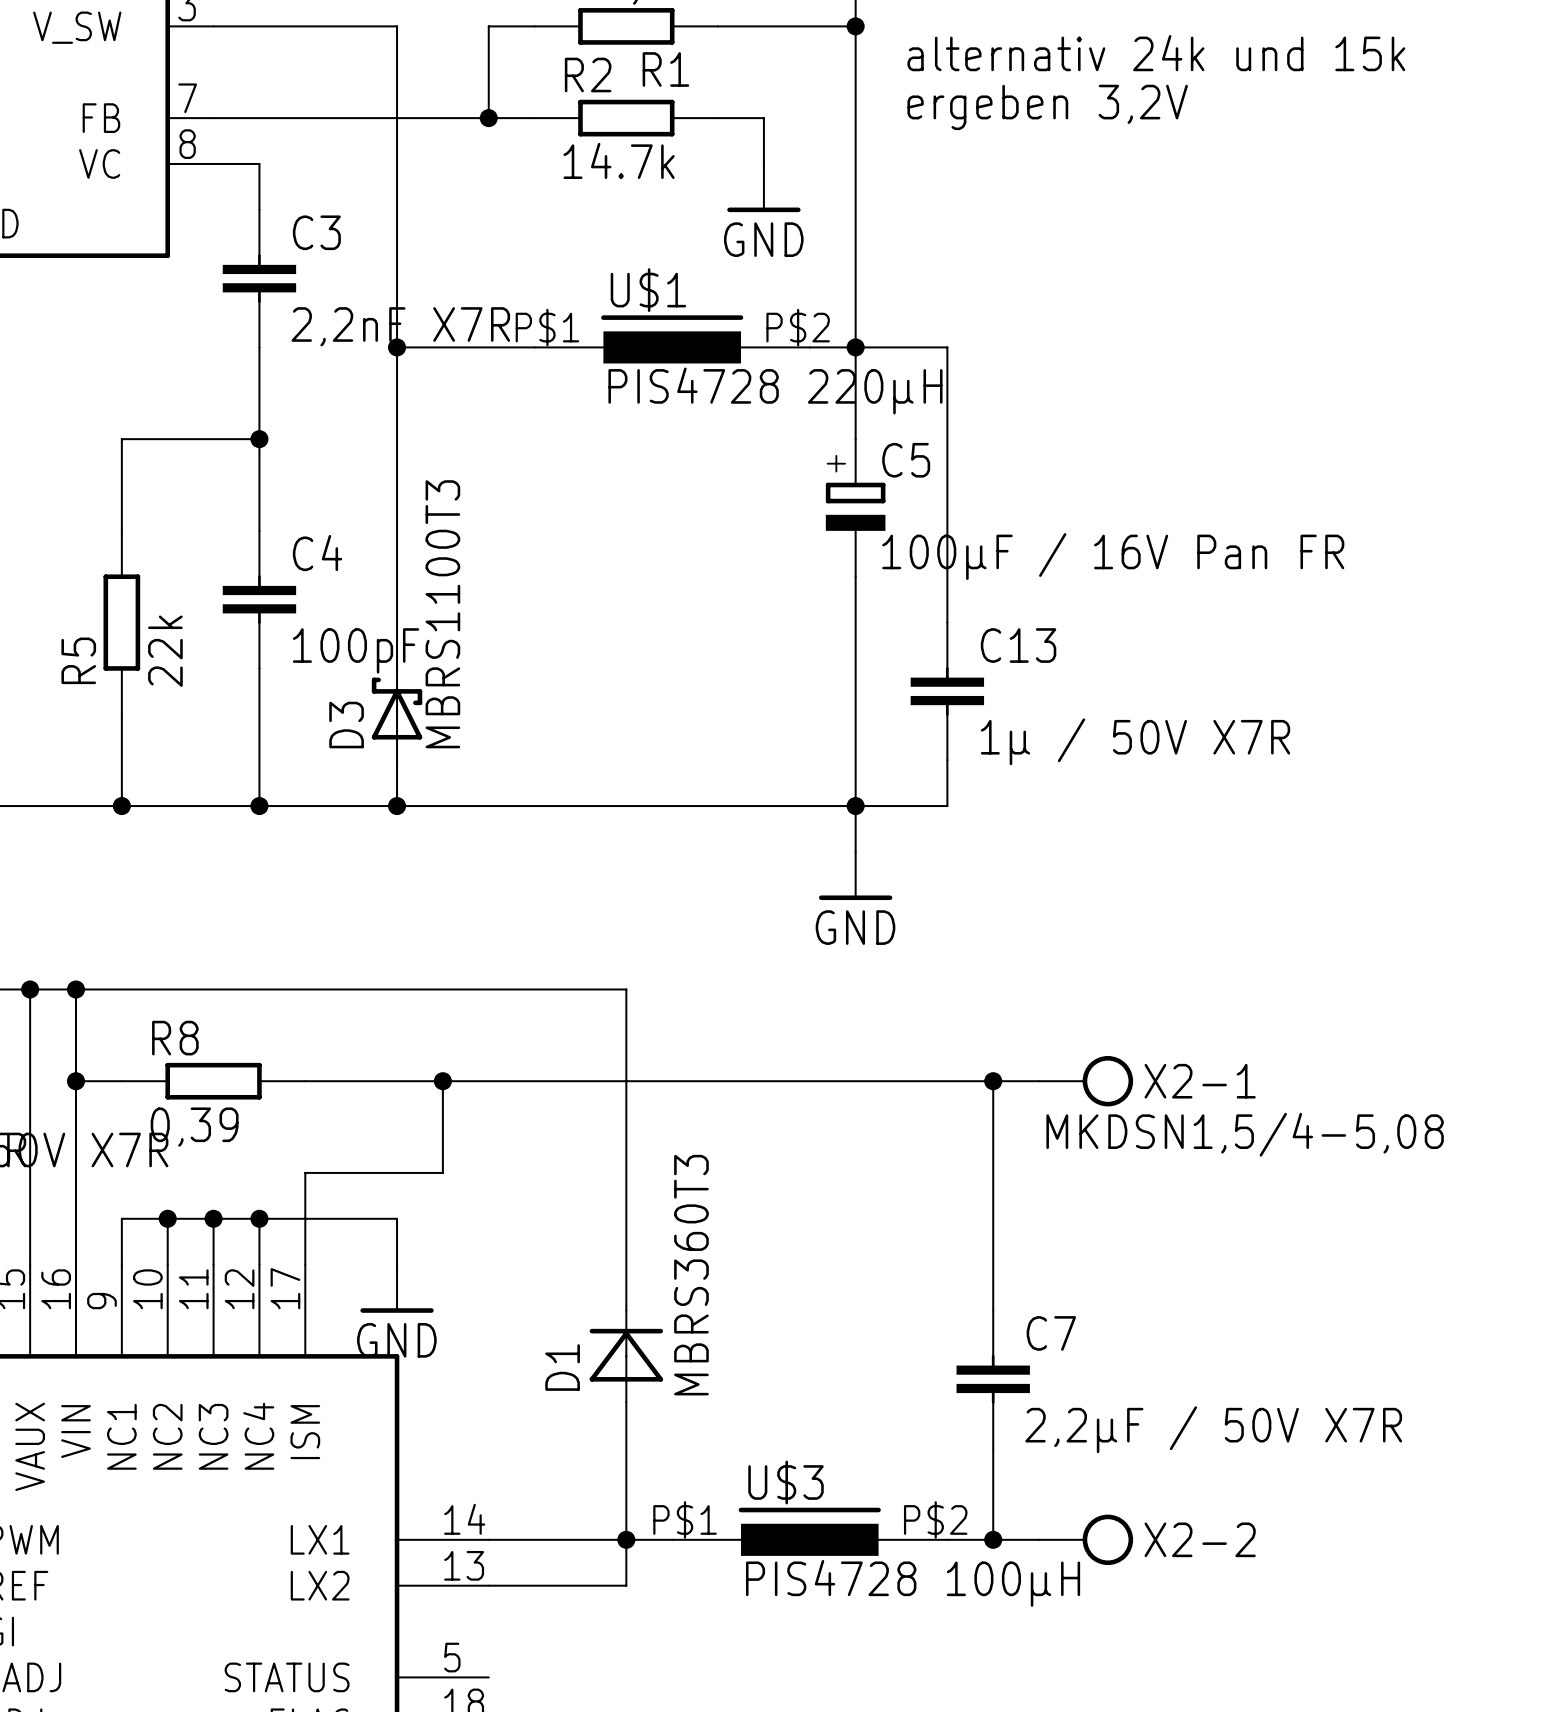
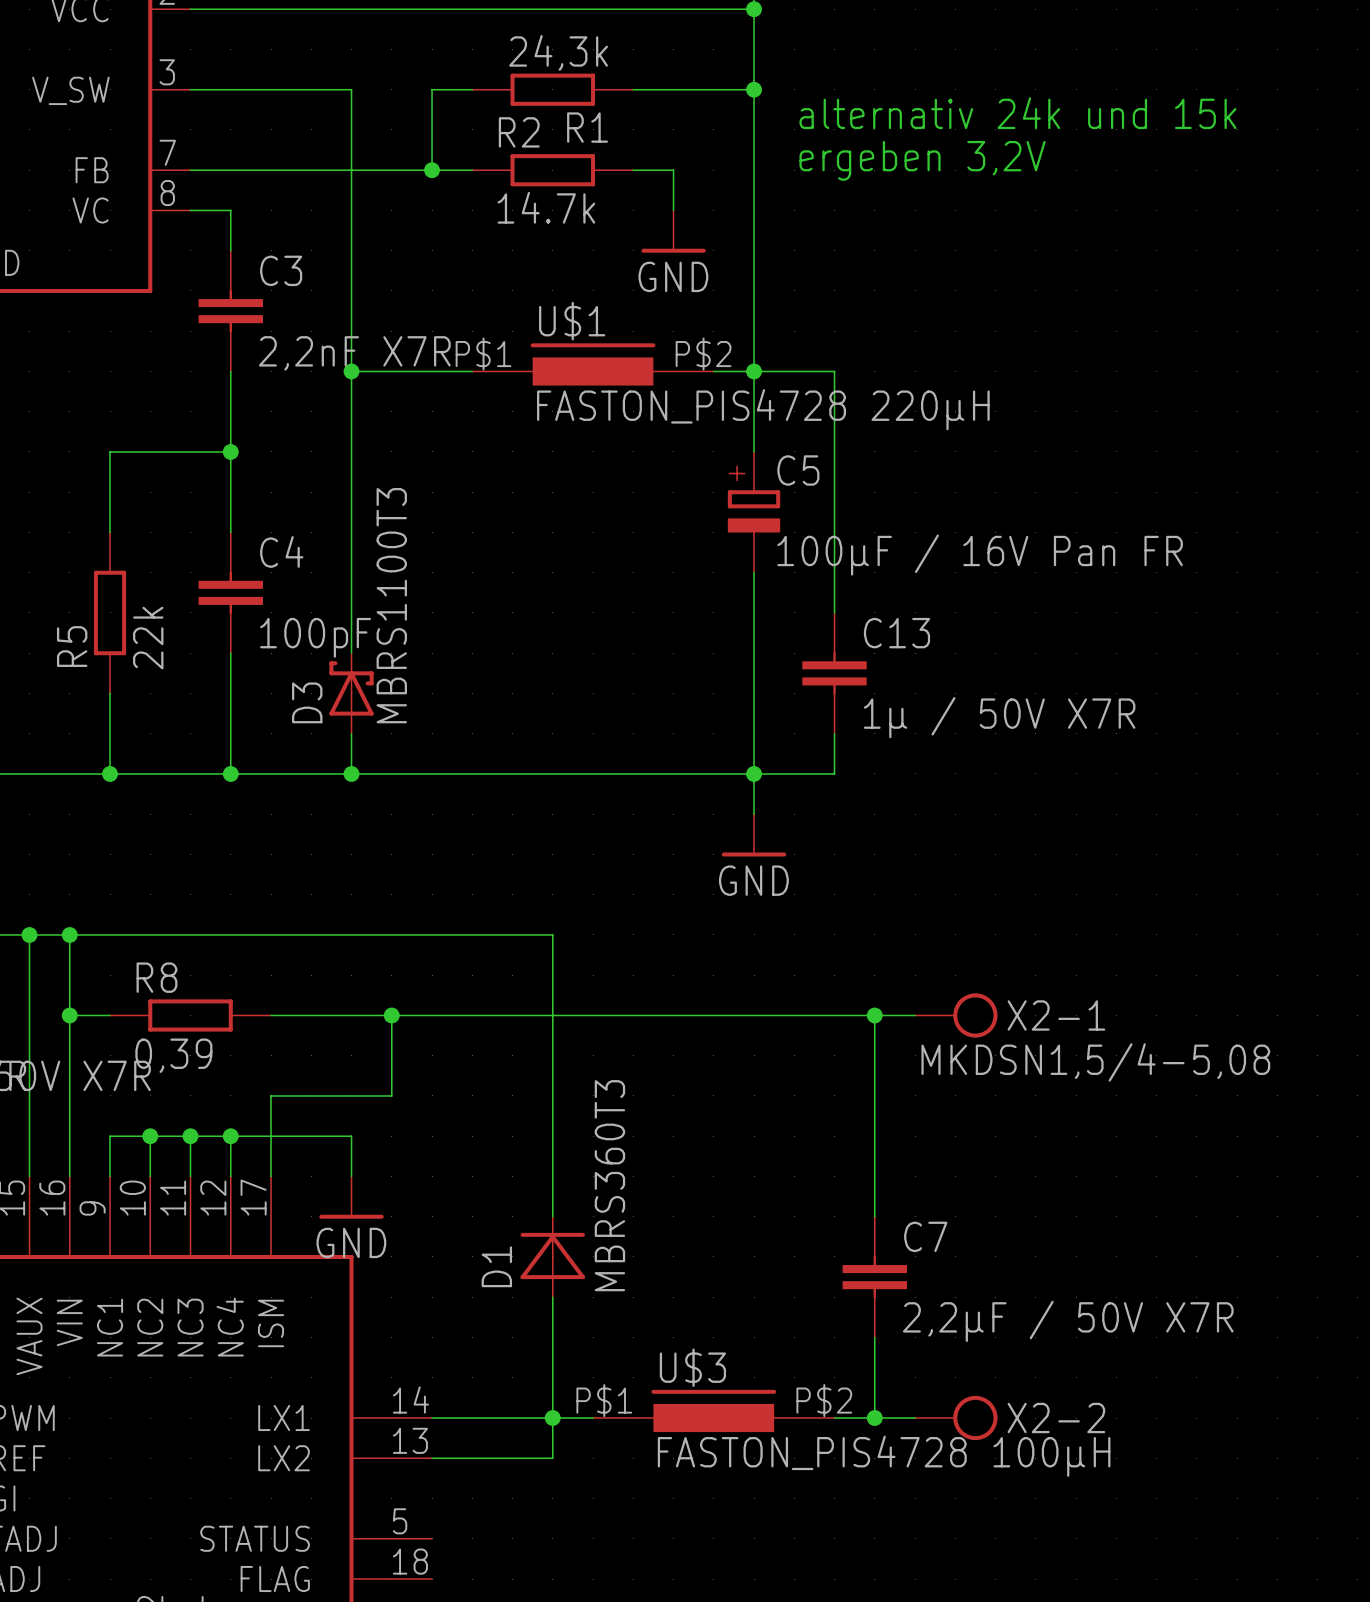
U$1 value: PIS4728 220µH (775, 390) -> FASTON_PIS4728 220µH (763, 409)
U$3 value: PIS4728 100µH (913, 1583) -> FASTON_PIS4728 100µH (884, 1456)

